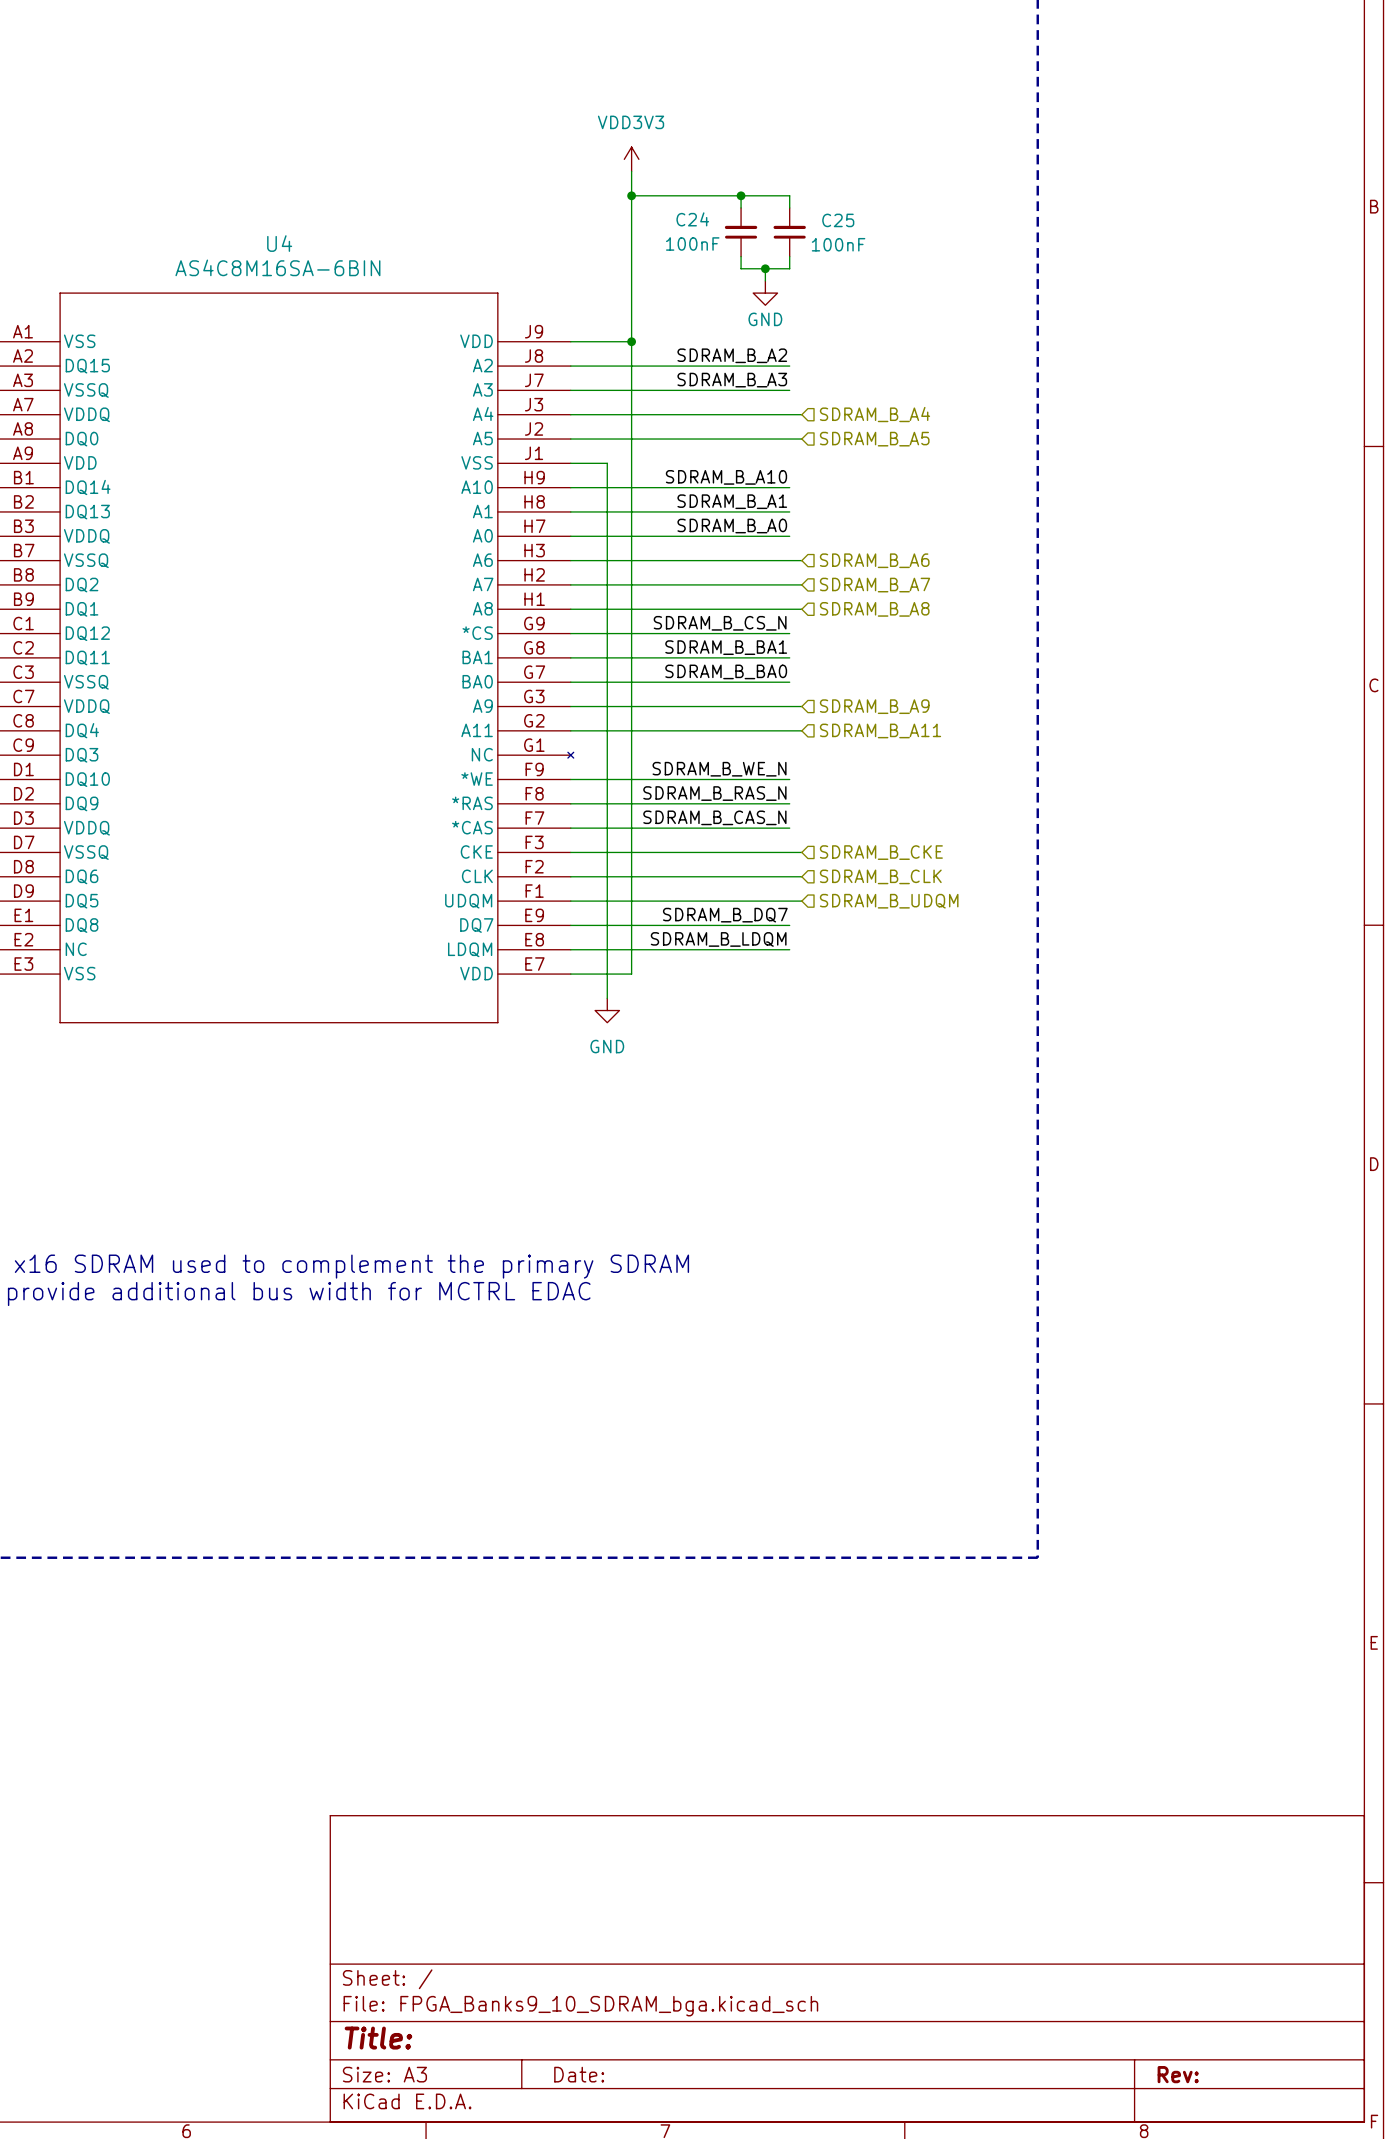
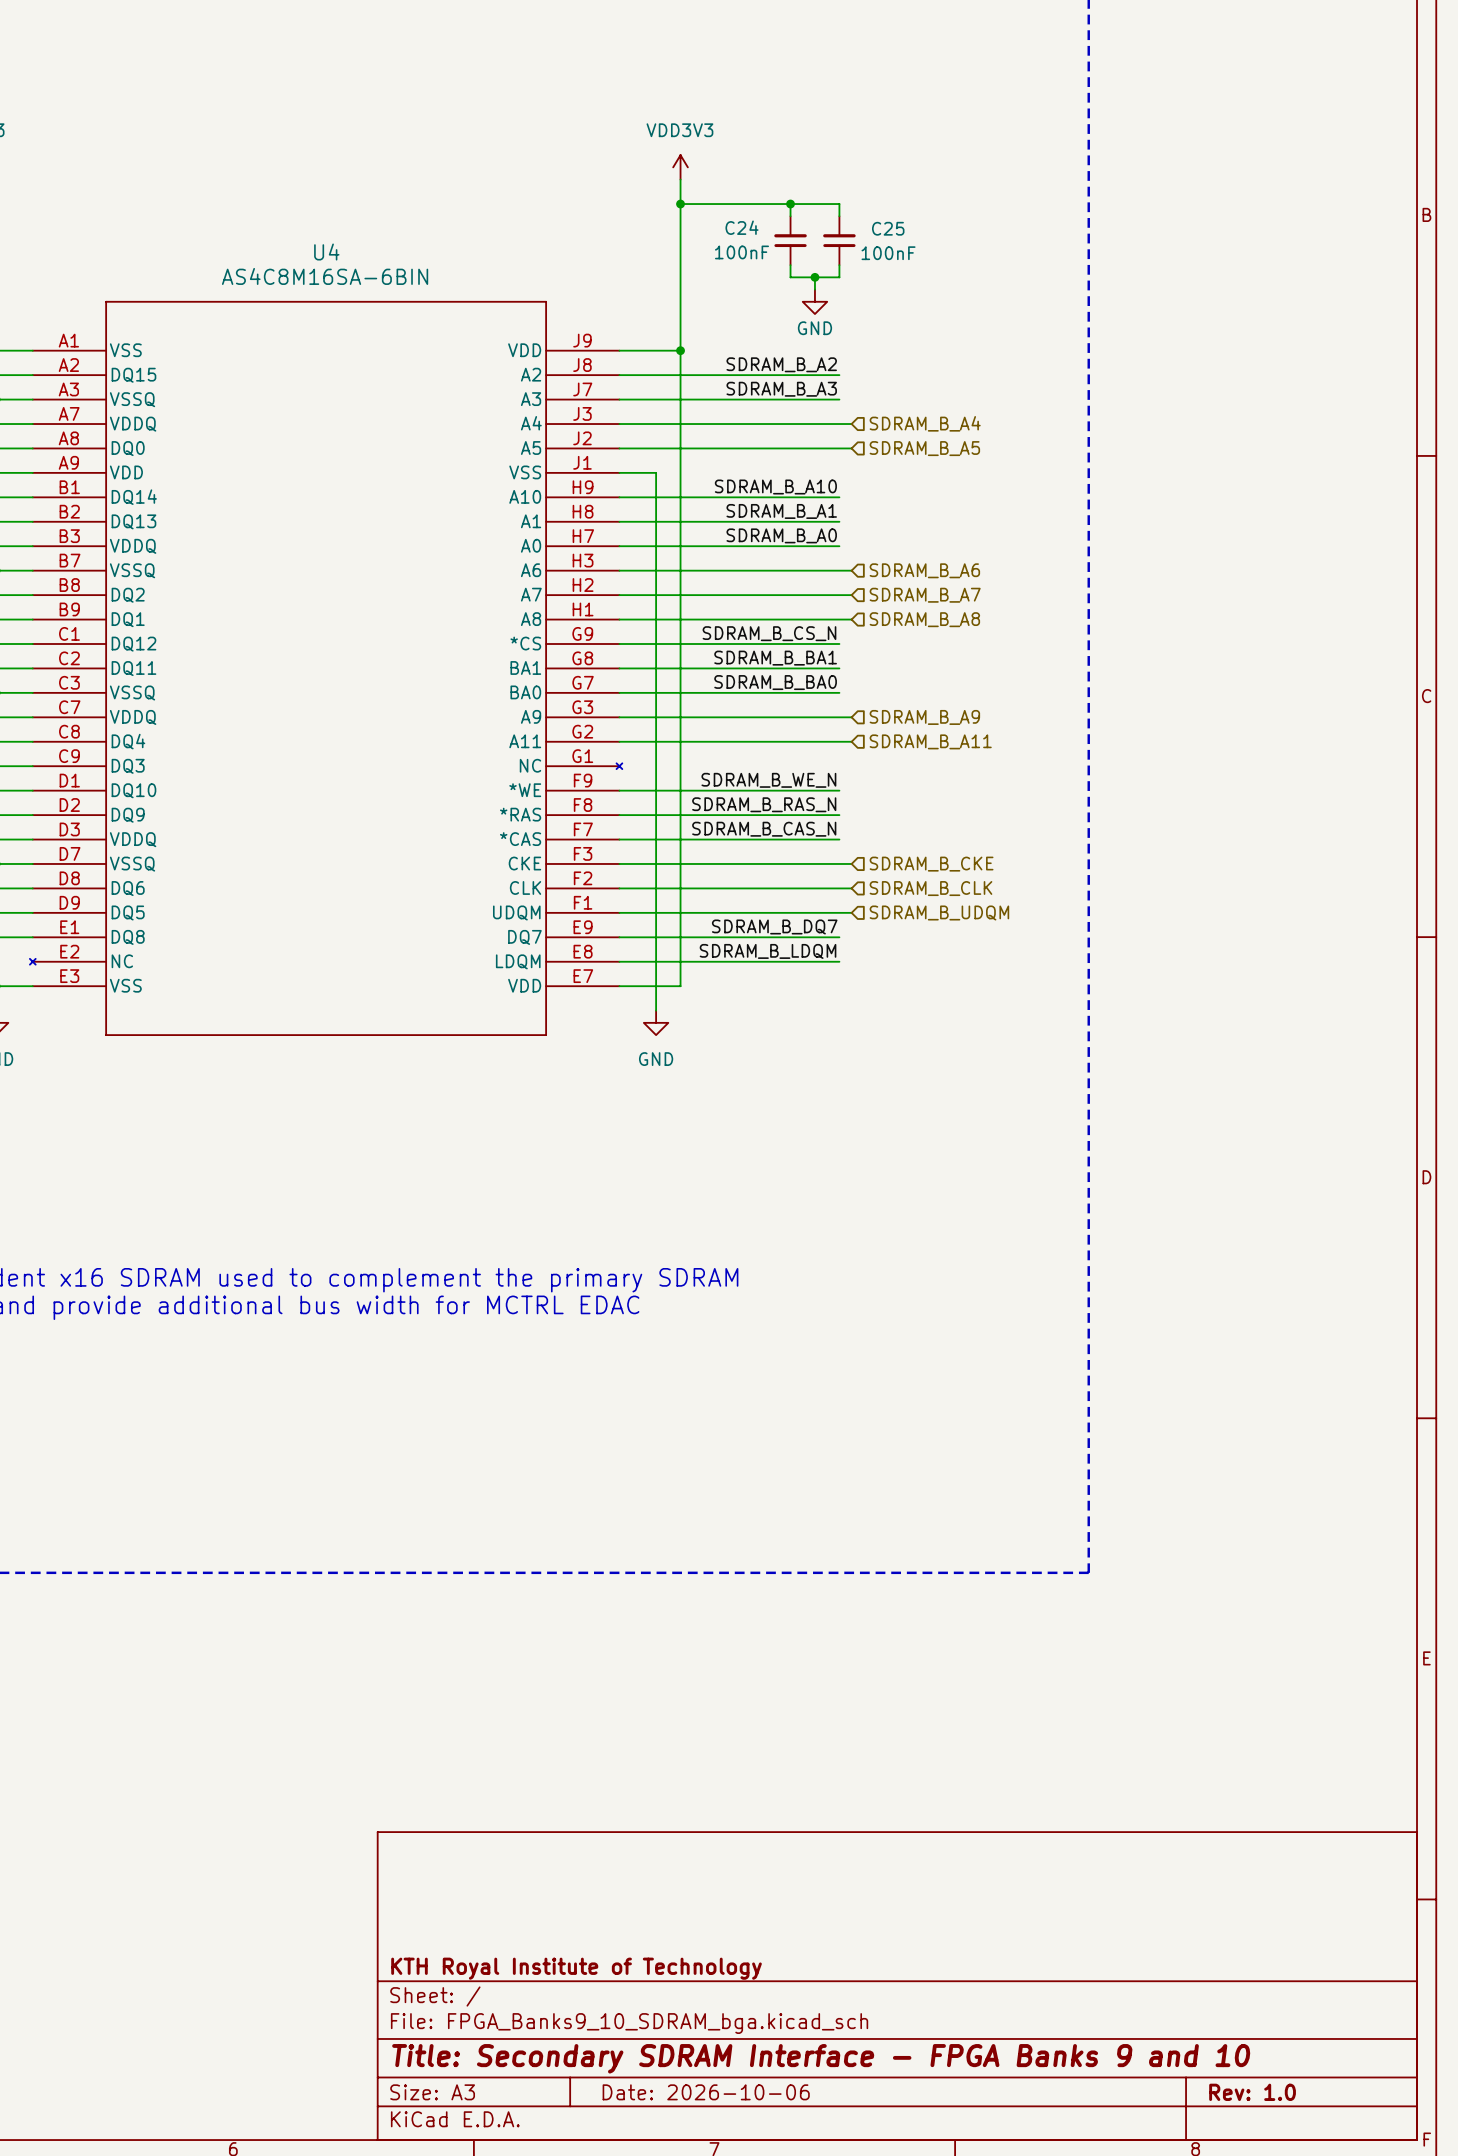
title block: none -> KTH Royal Institute of Technology (576, 1968)
title block: Title: (378, 2038) -> Title: Secondary SDRAM Interface - FPGA Banks 9 and 10 (821, 2058)
title block: Date: (579, 2074) -> Date: 2026-10-06 (706, 2092)
title block: Rev: (1178, 2074) -> Rev: 1.0 (1252, 2092)

